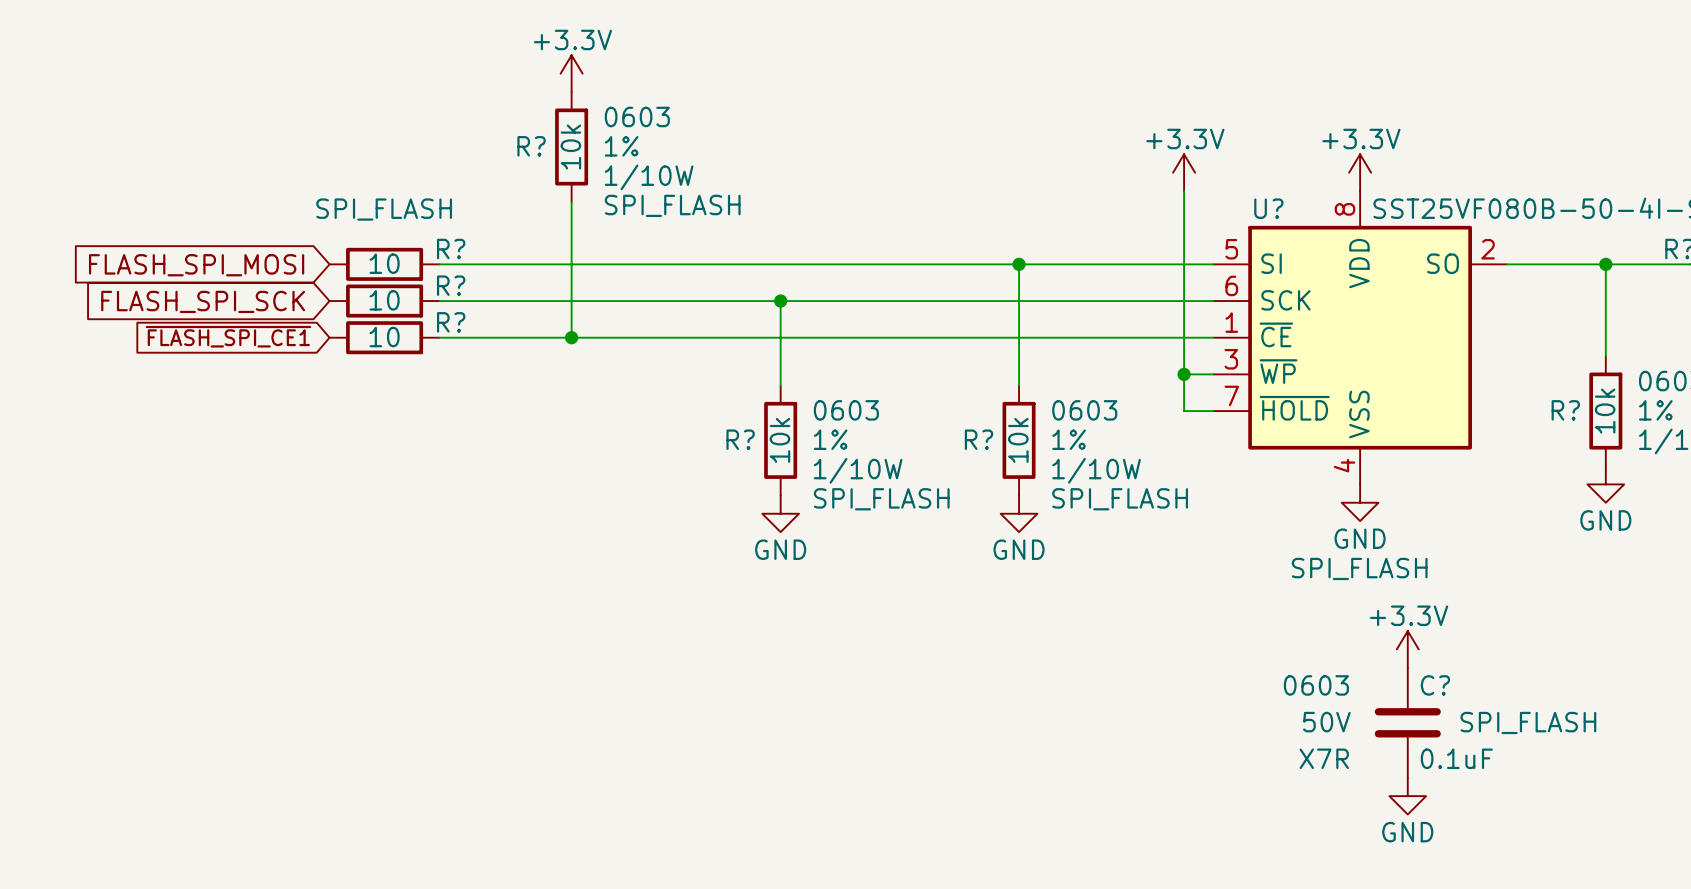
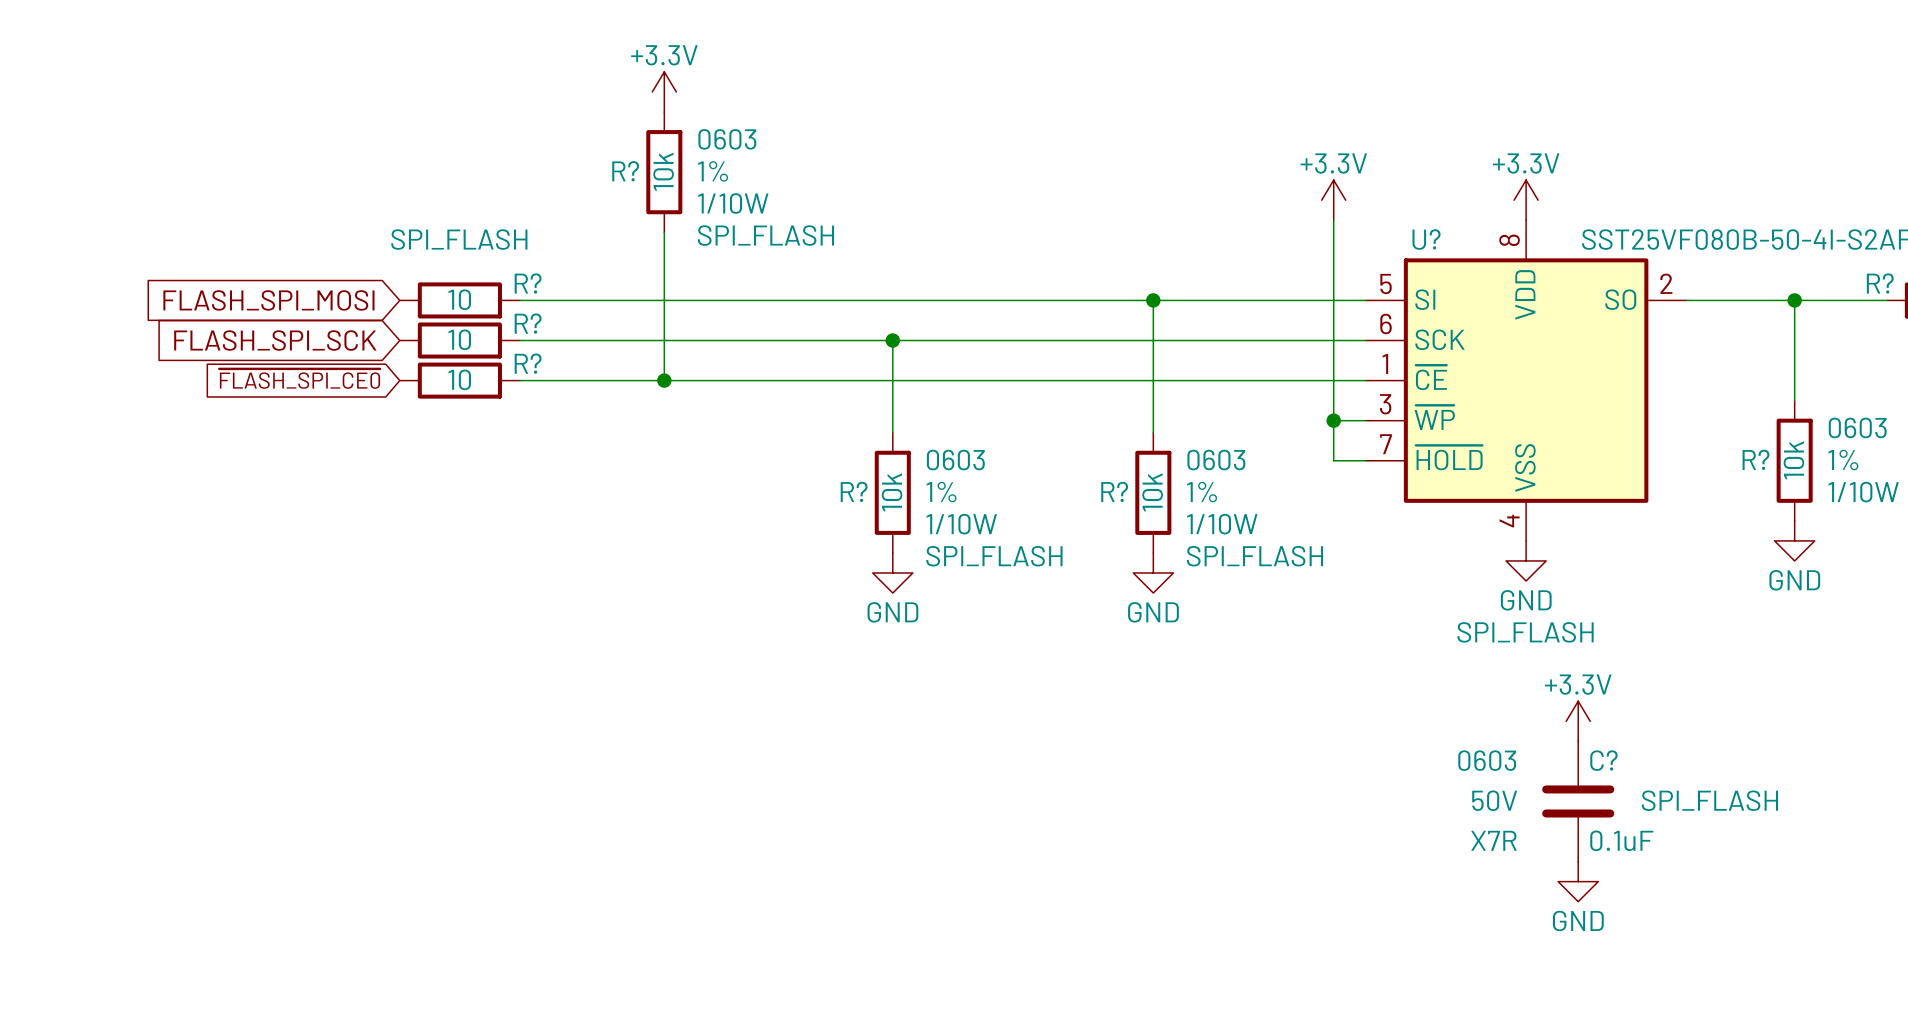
global label: ~{FLASH_SPI_CE1} (228, 336) -> ~{FLASH_SPI_CE0} (299, 378)

